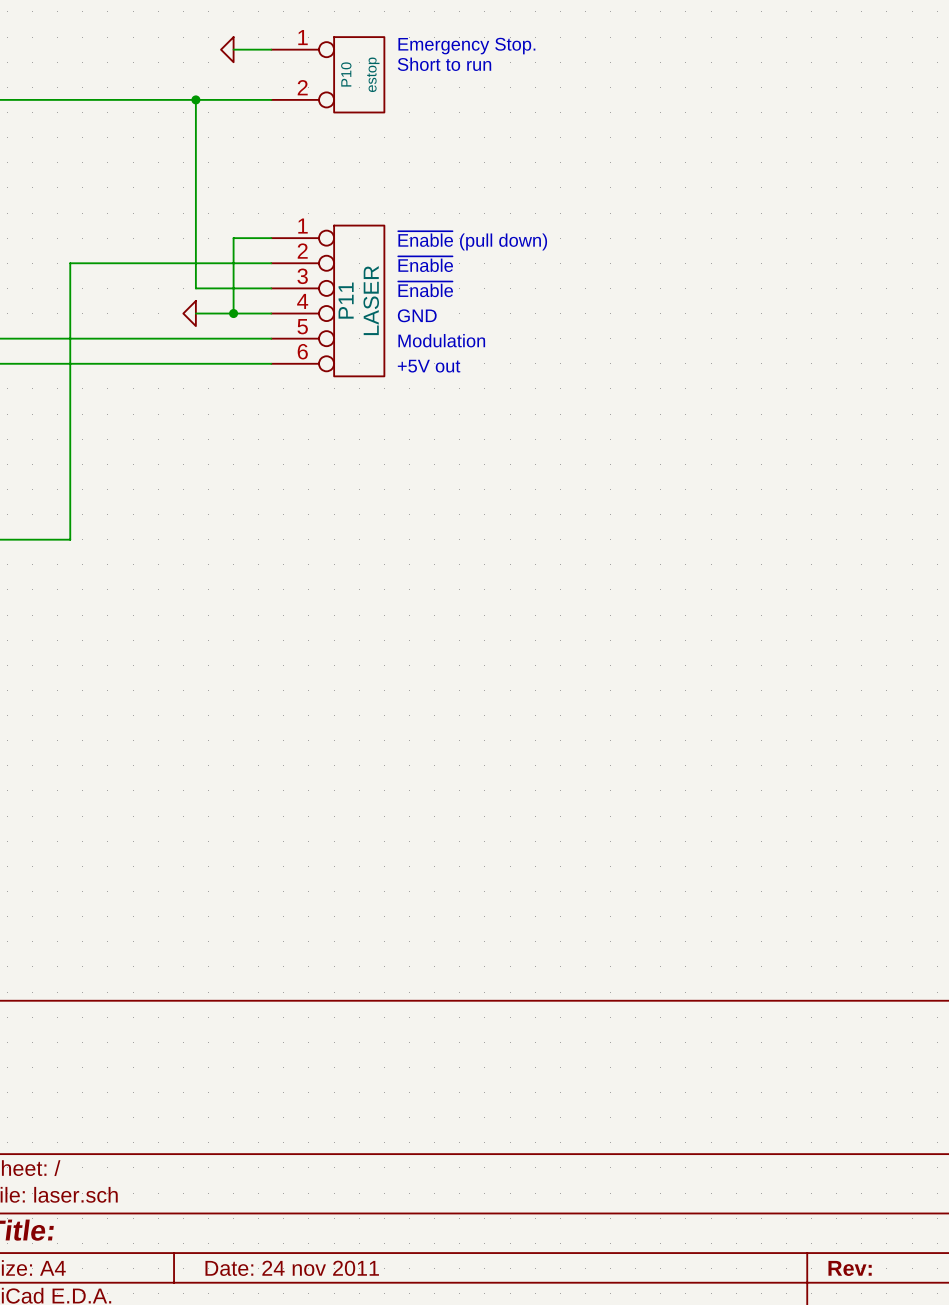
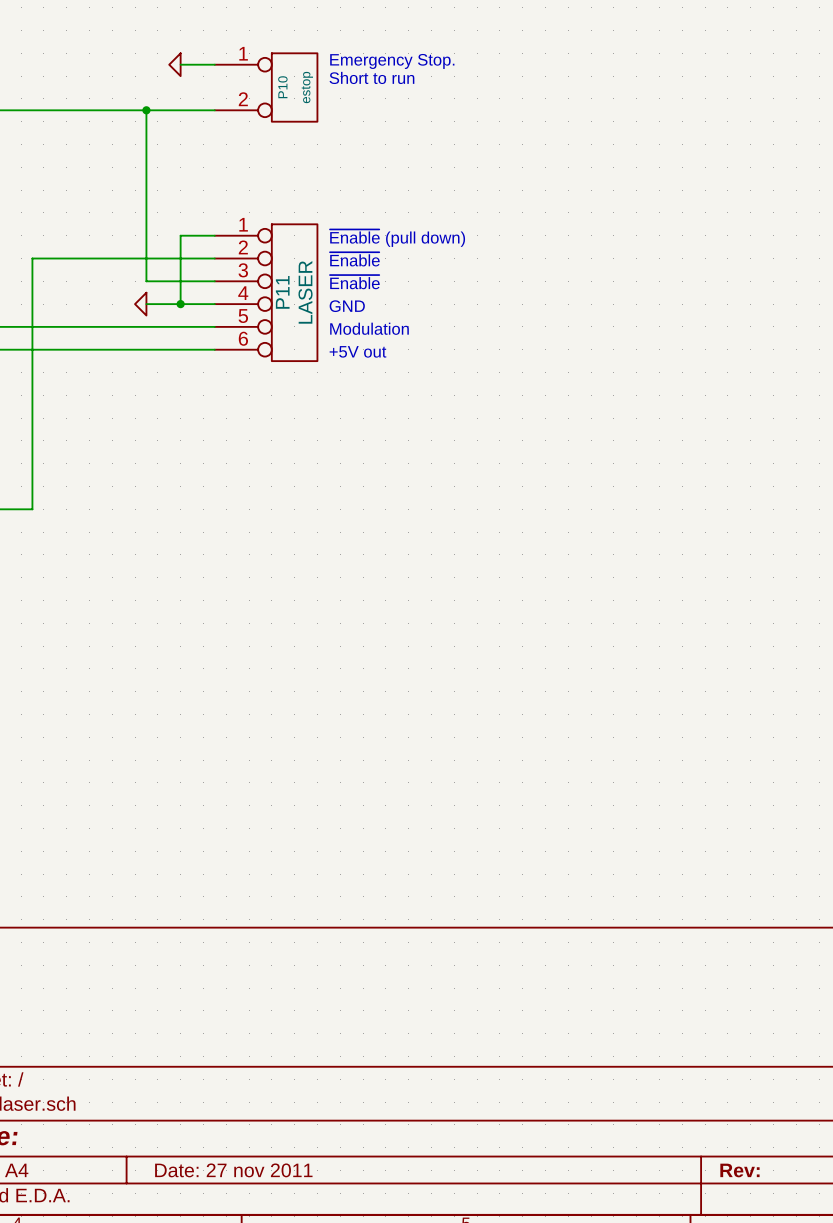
title block: Date: 24 nov 2011 (292, 1268) -> Date: 27 nov 2011 (233, 1170)

